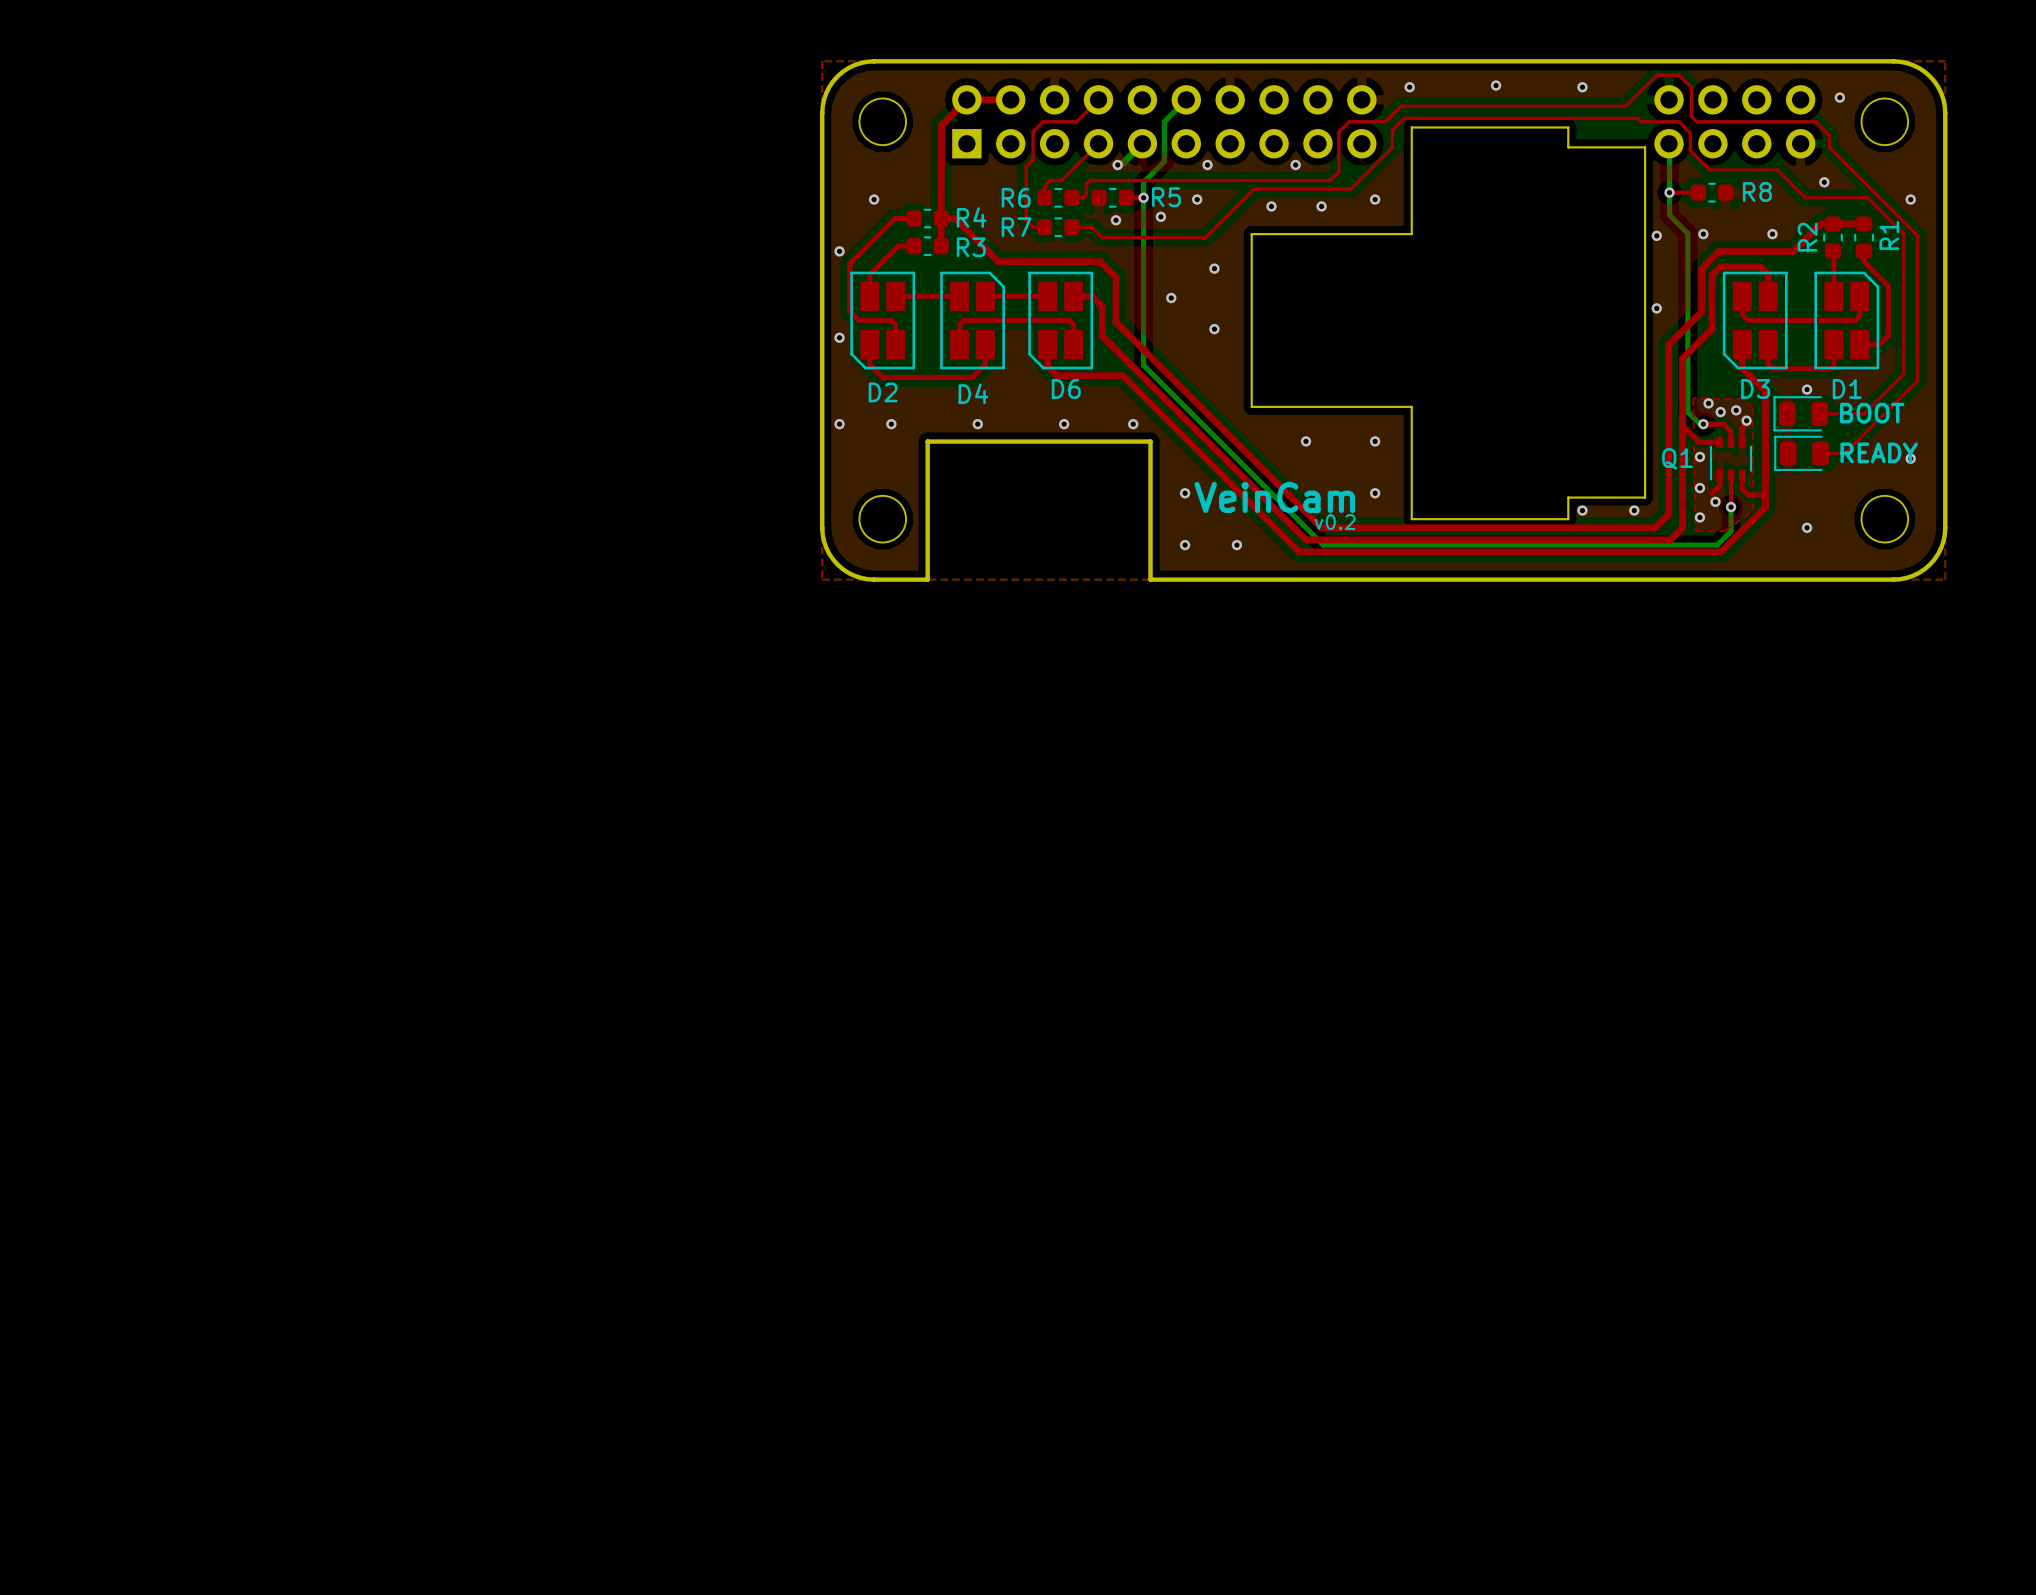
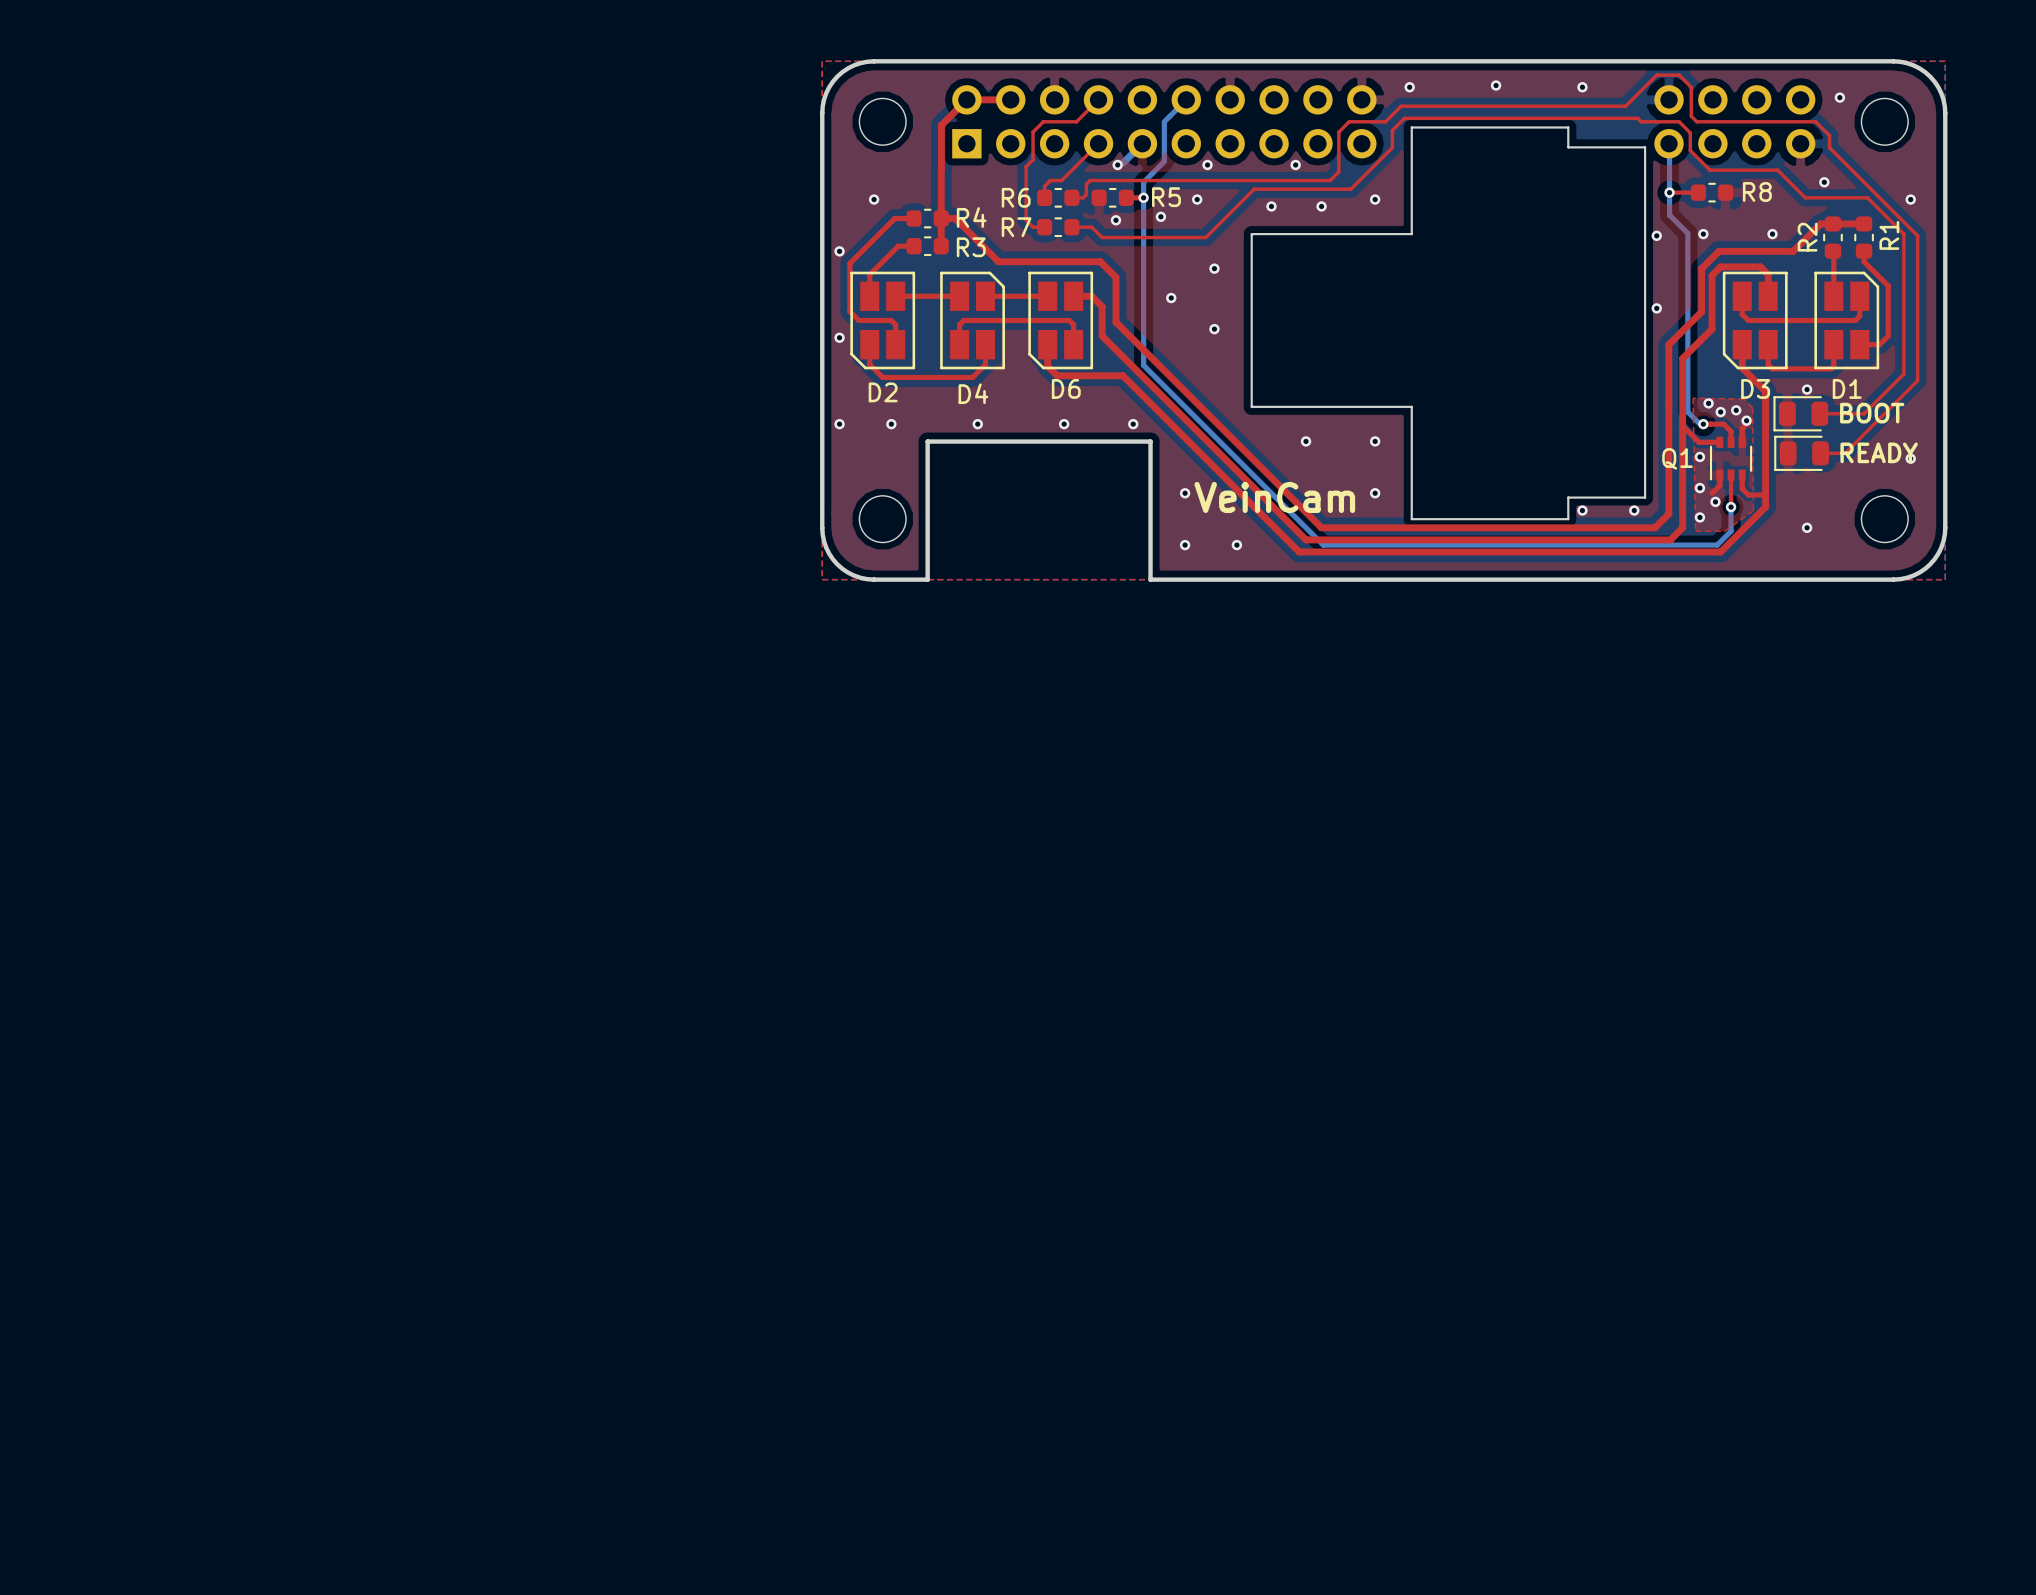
text: v0.2 (1335, 522) -> none

